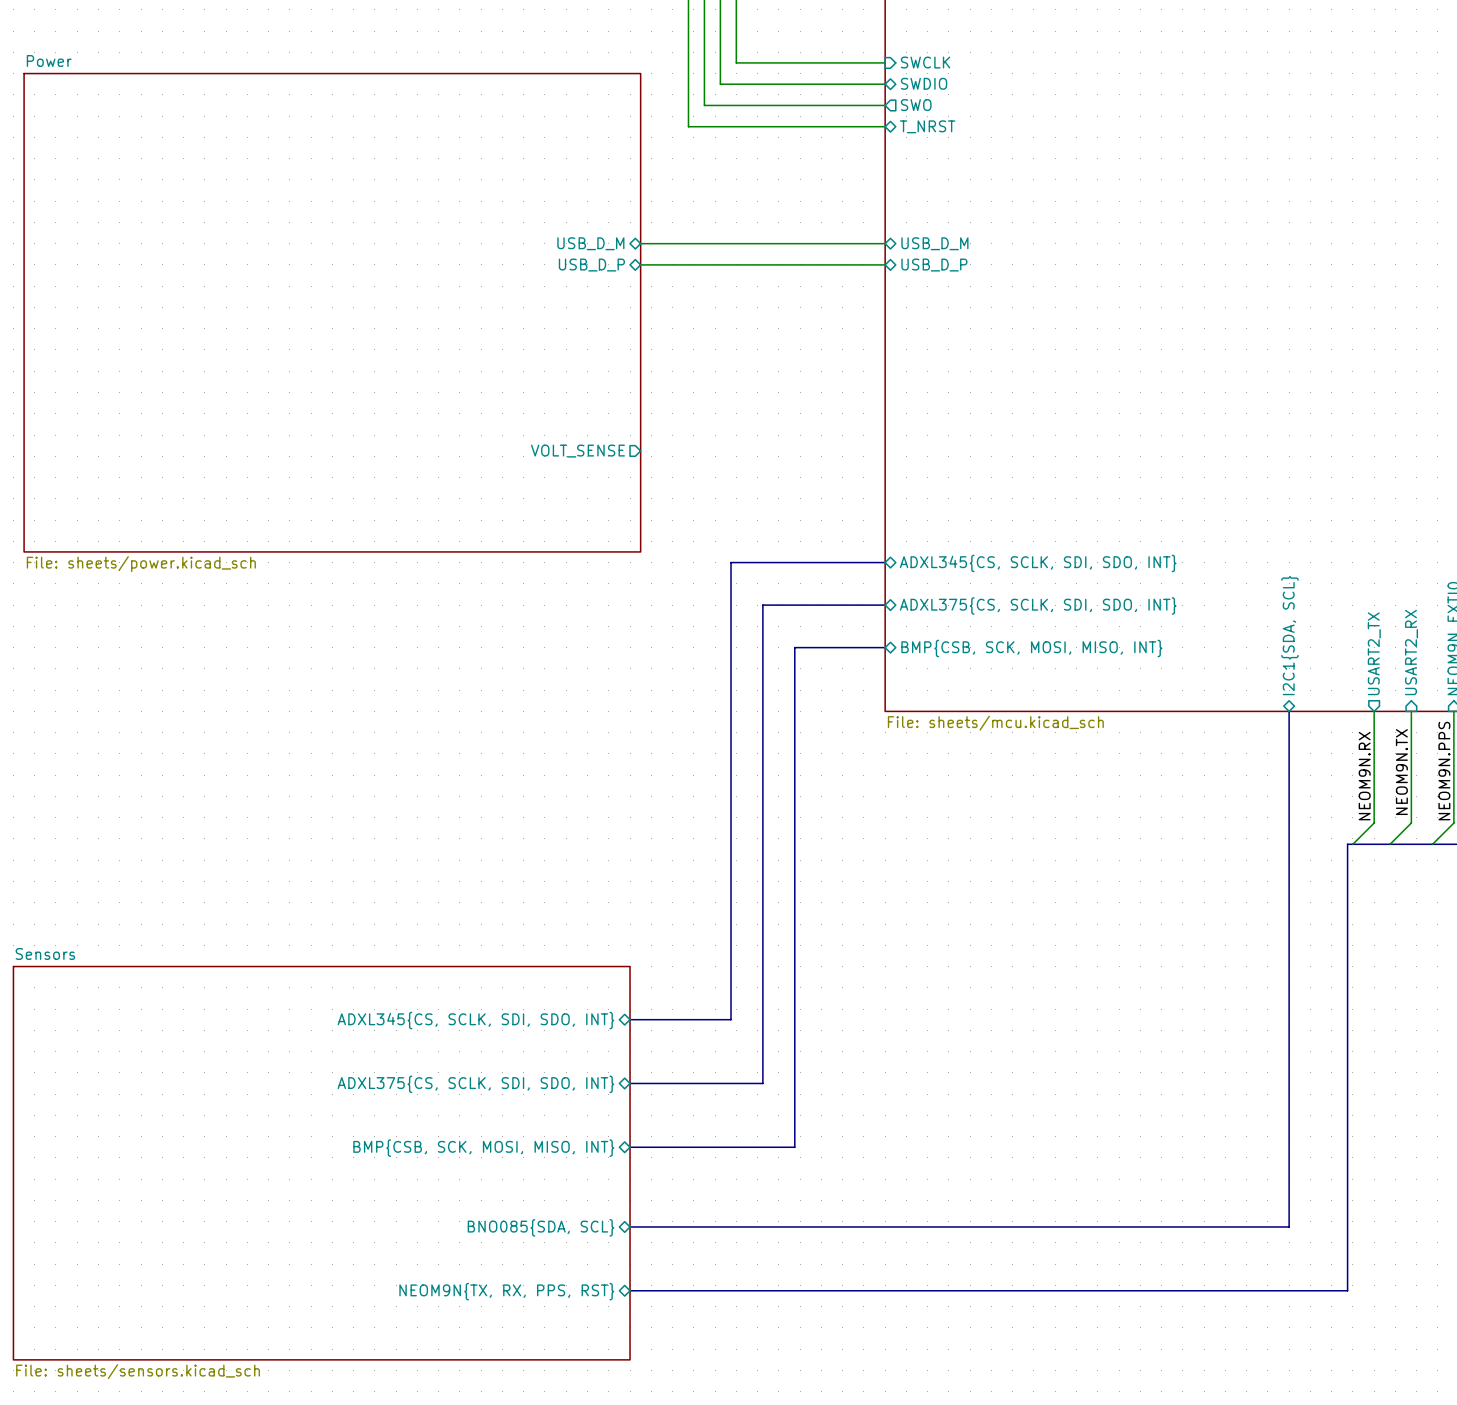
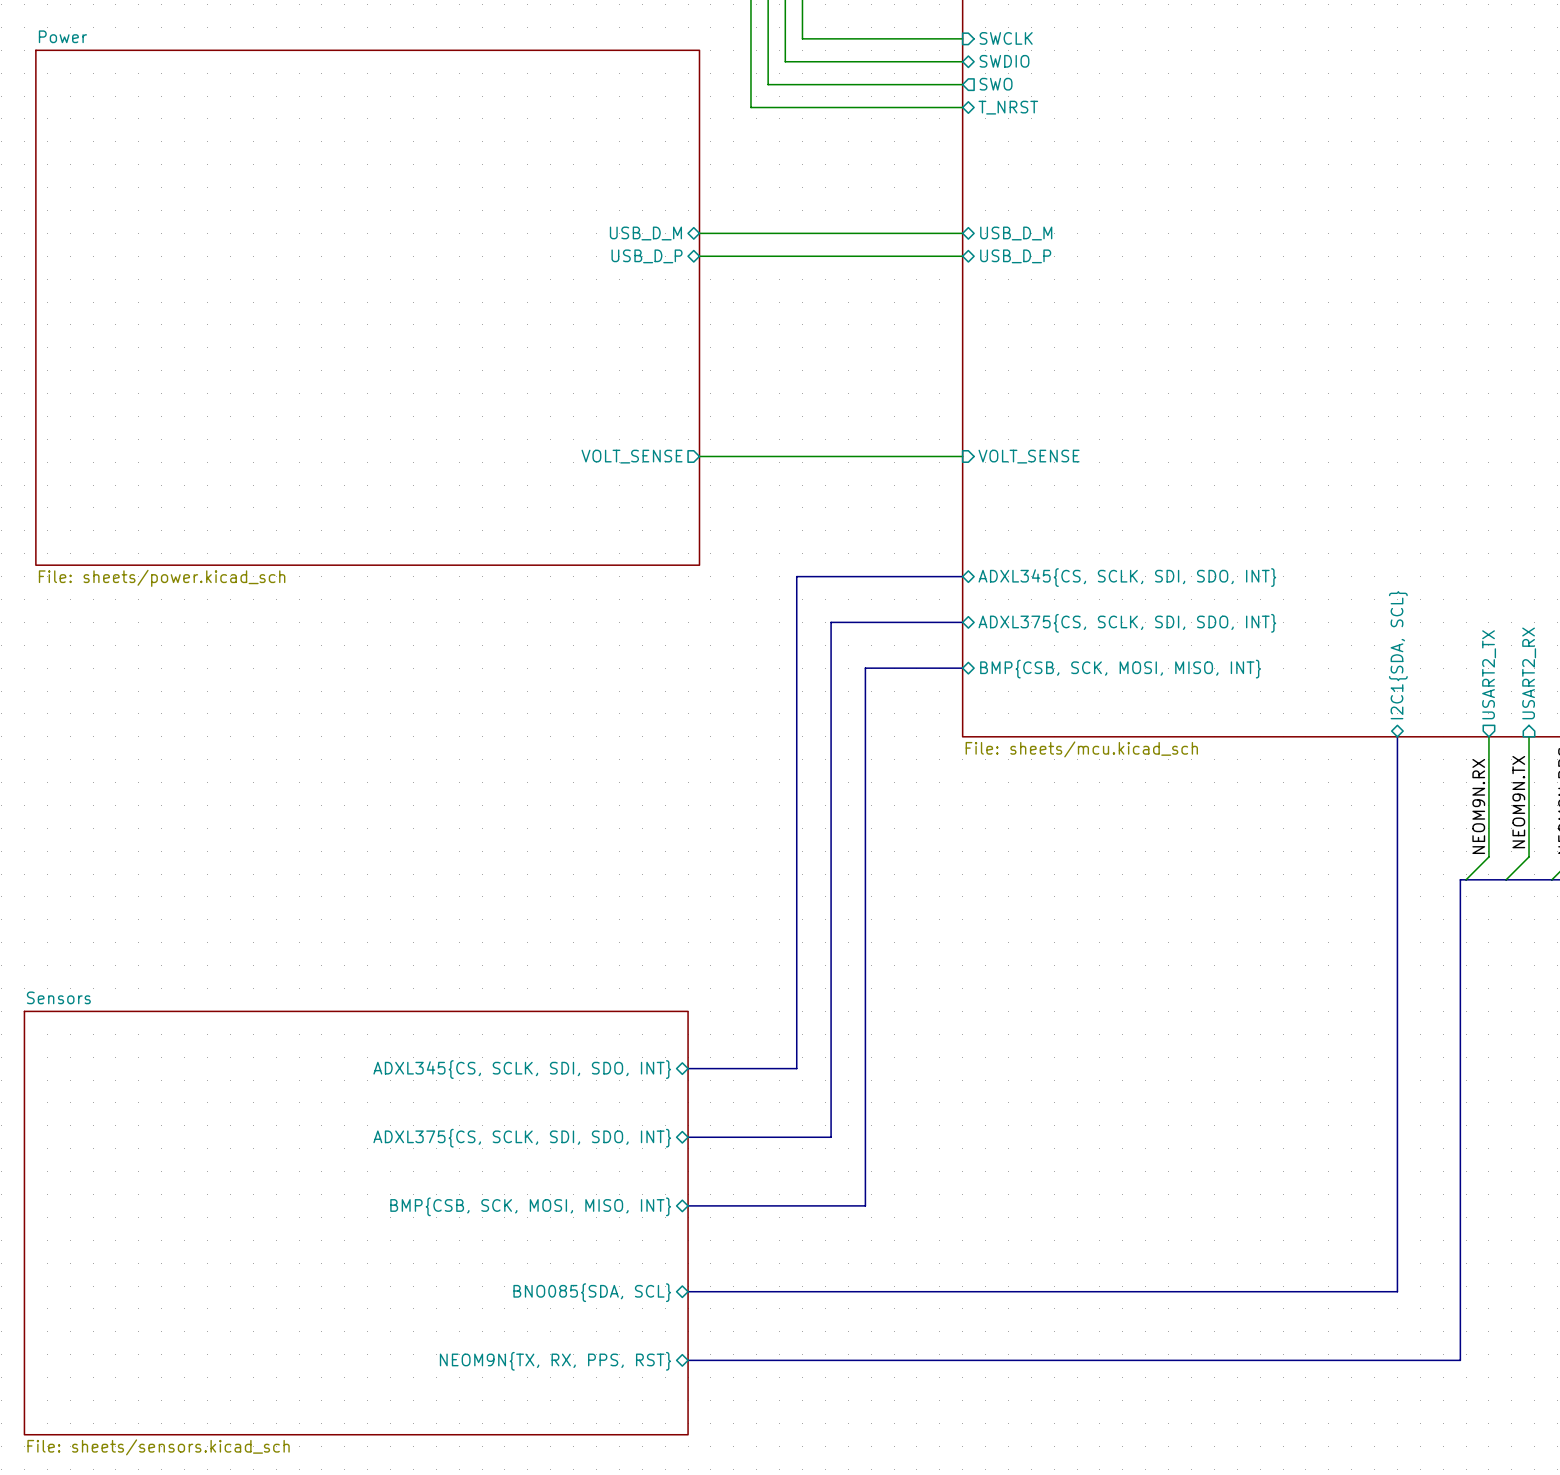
wire: none -> (699, 456) (962, 456)
sheet pin: none -> VOLT_SENSE (1029, 456)

